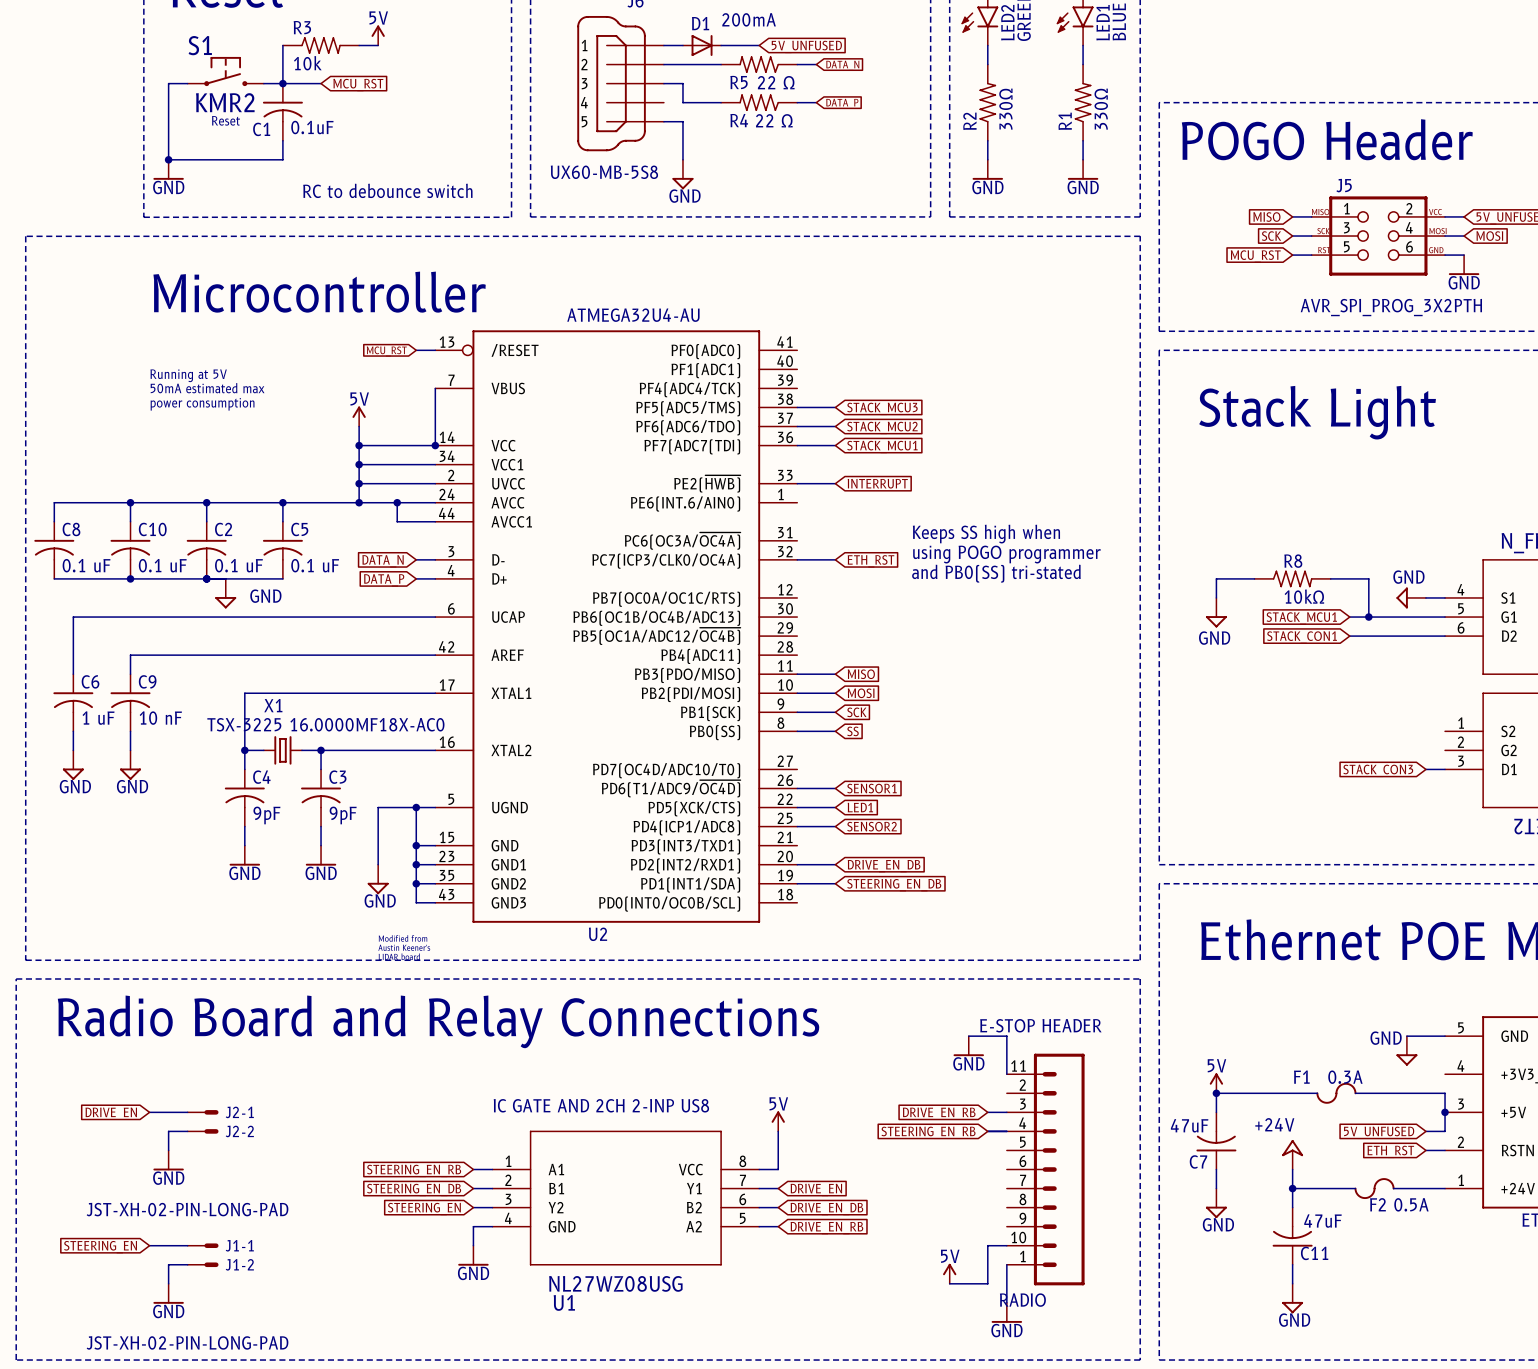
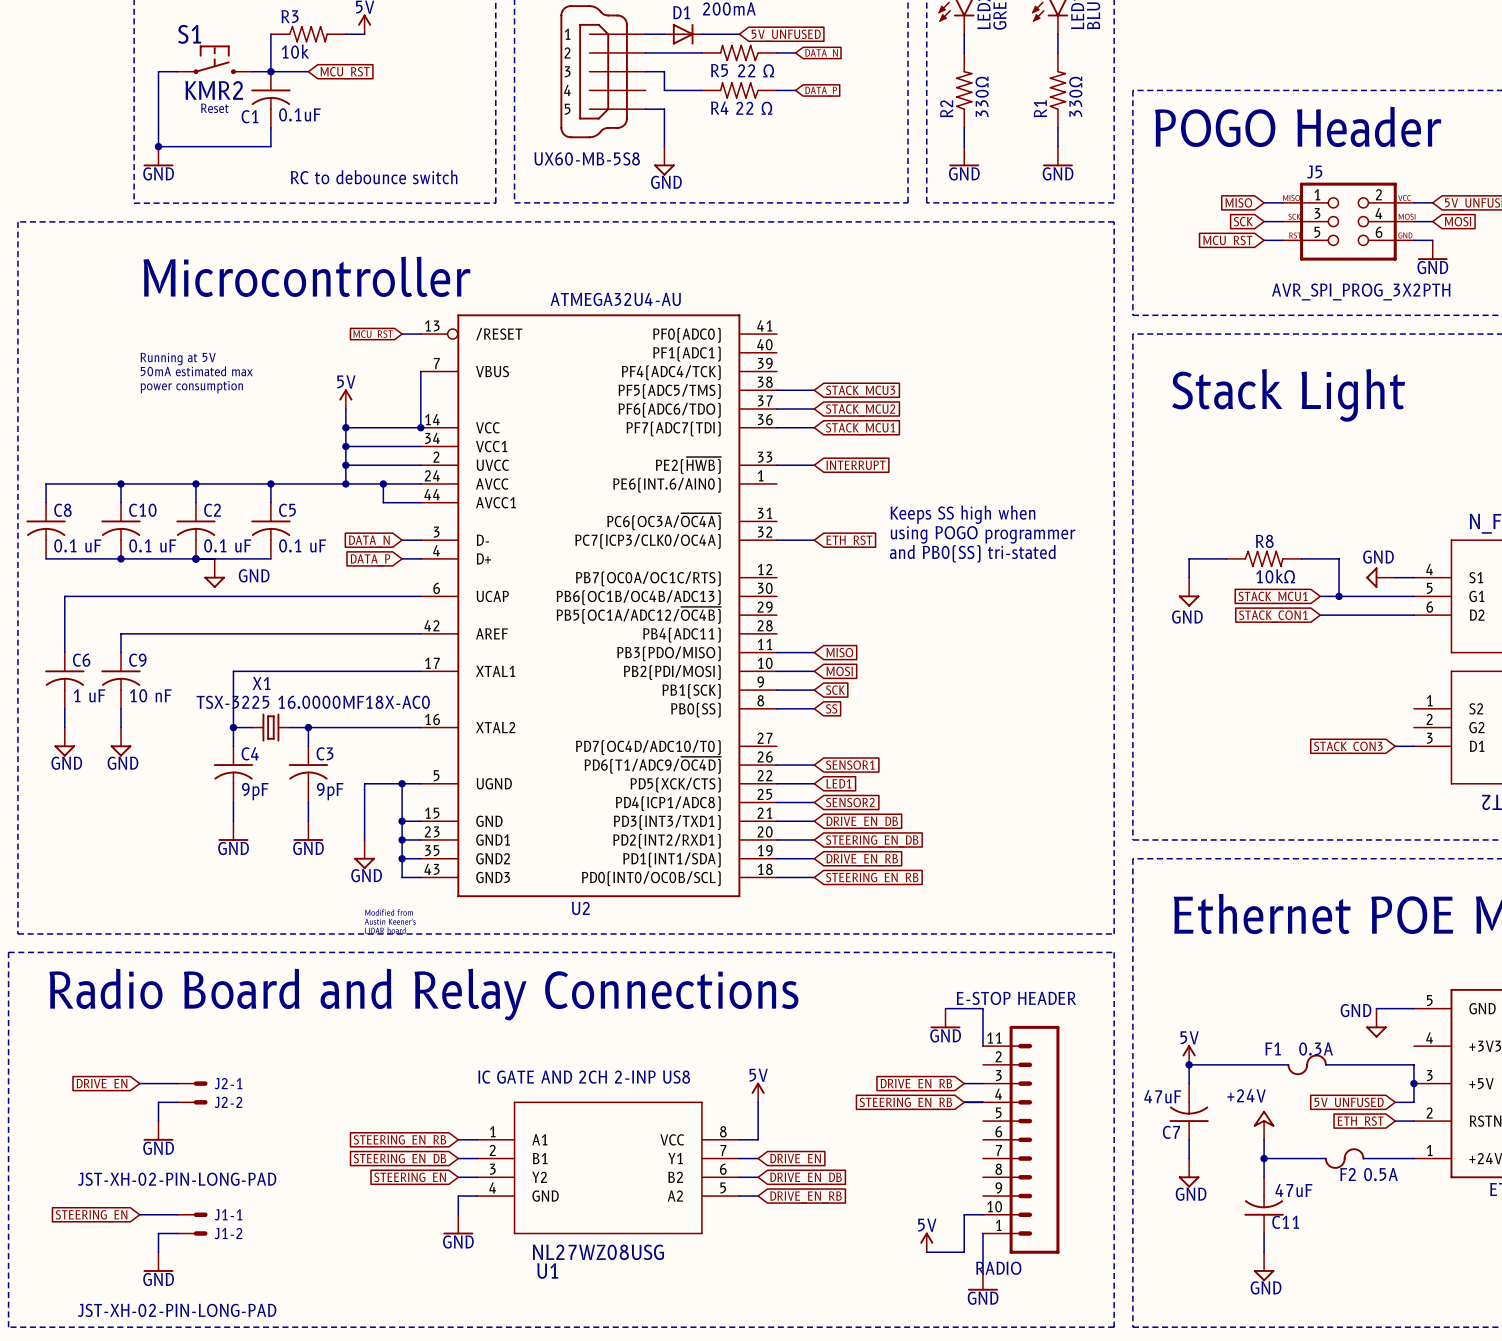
wire: none -> (776, 821) (814, 821)
global label: none -> DRIVE_EN_DB (862, 822)
global label: DRIVE_EN_DB (884, 866) -> STEERING_EN_DB (872, 841)
global label: STEERING_EN_DB (894, 885) -> DRIVE_EN_RB (862, 860)
wire: none -> (776, 877) (814, 877)
global label: none -> STEERING_EN_RB (872, 878)

